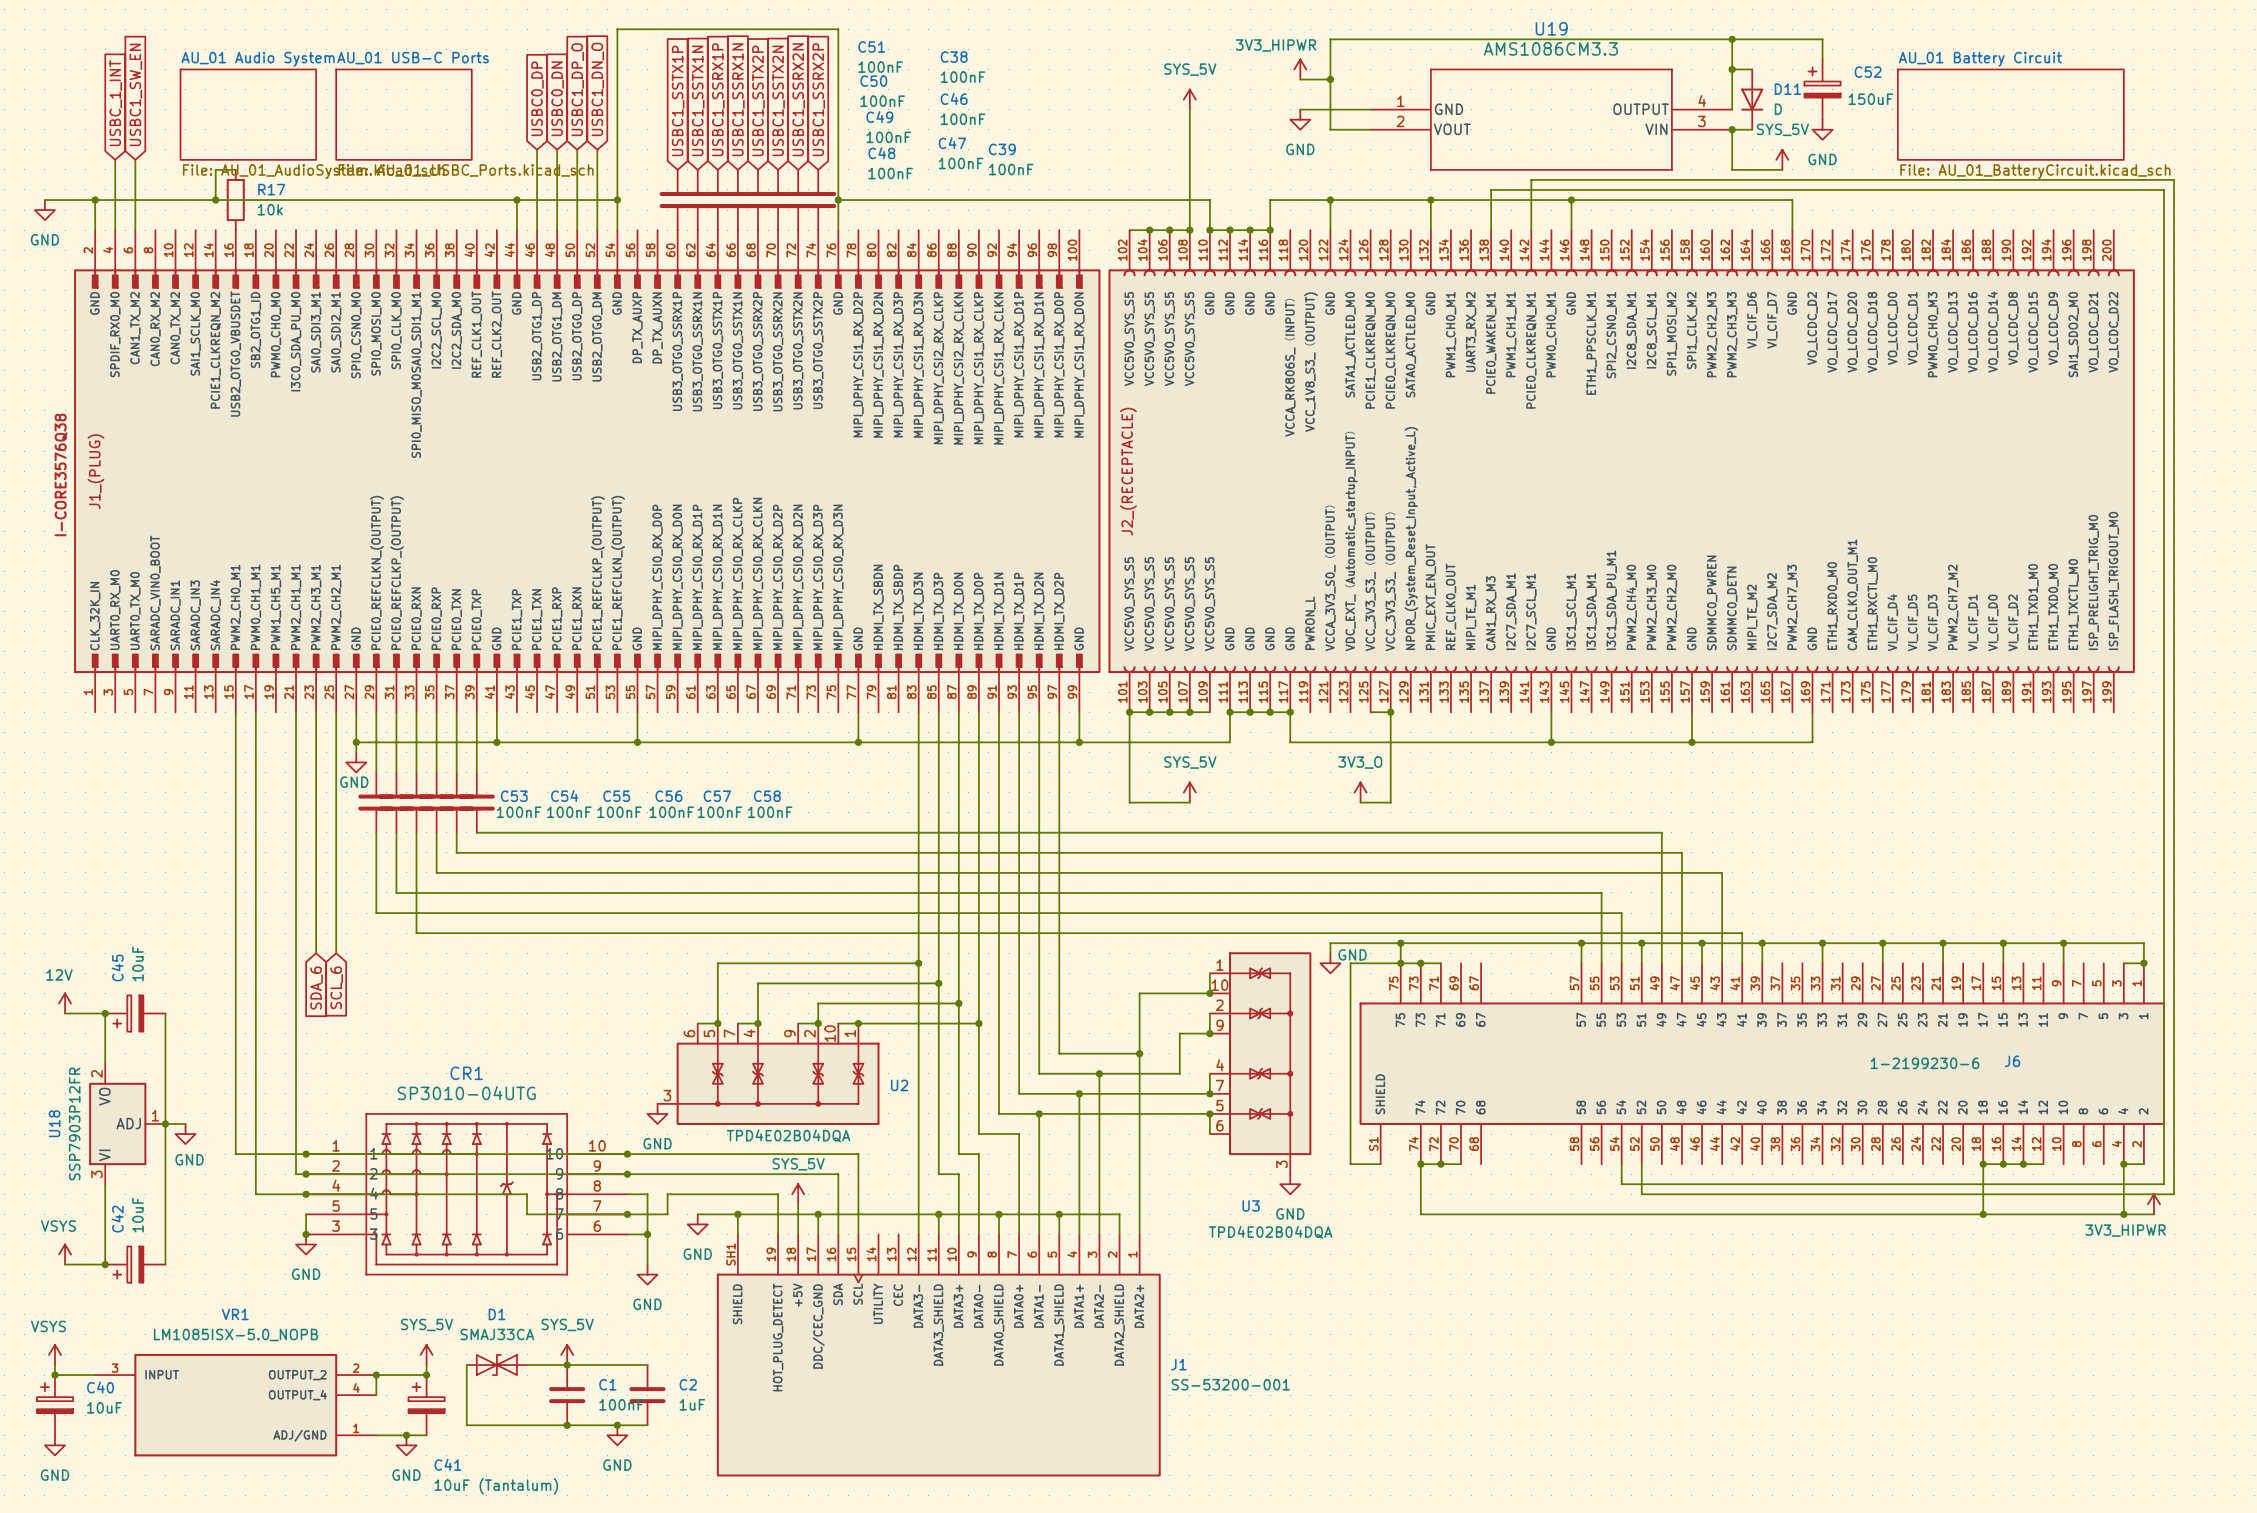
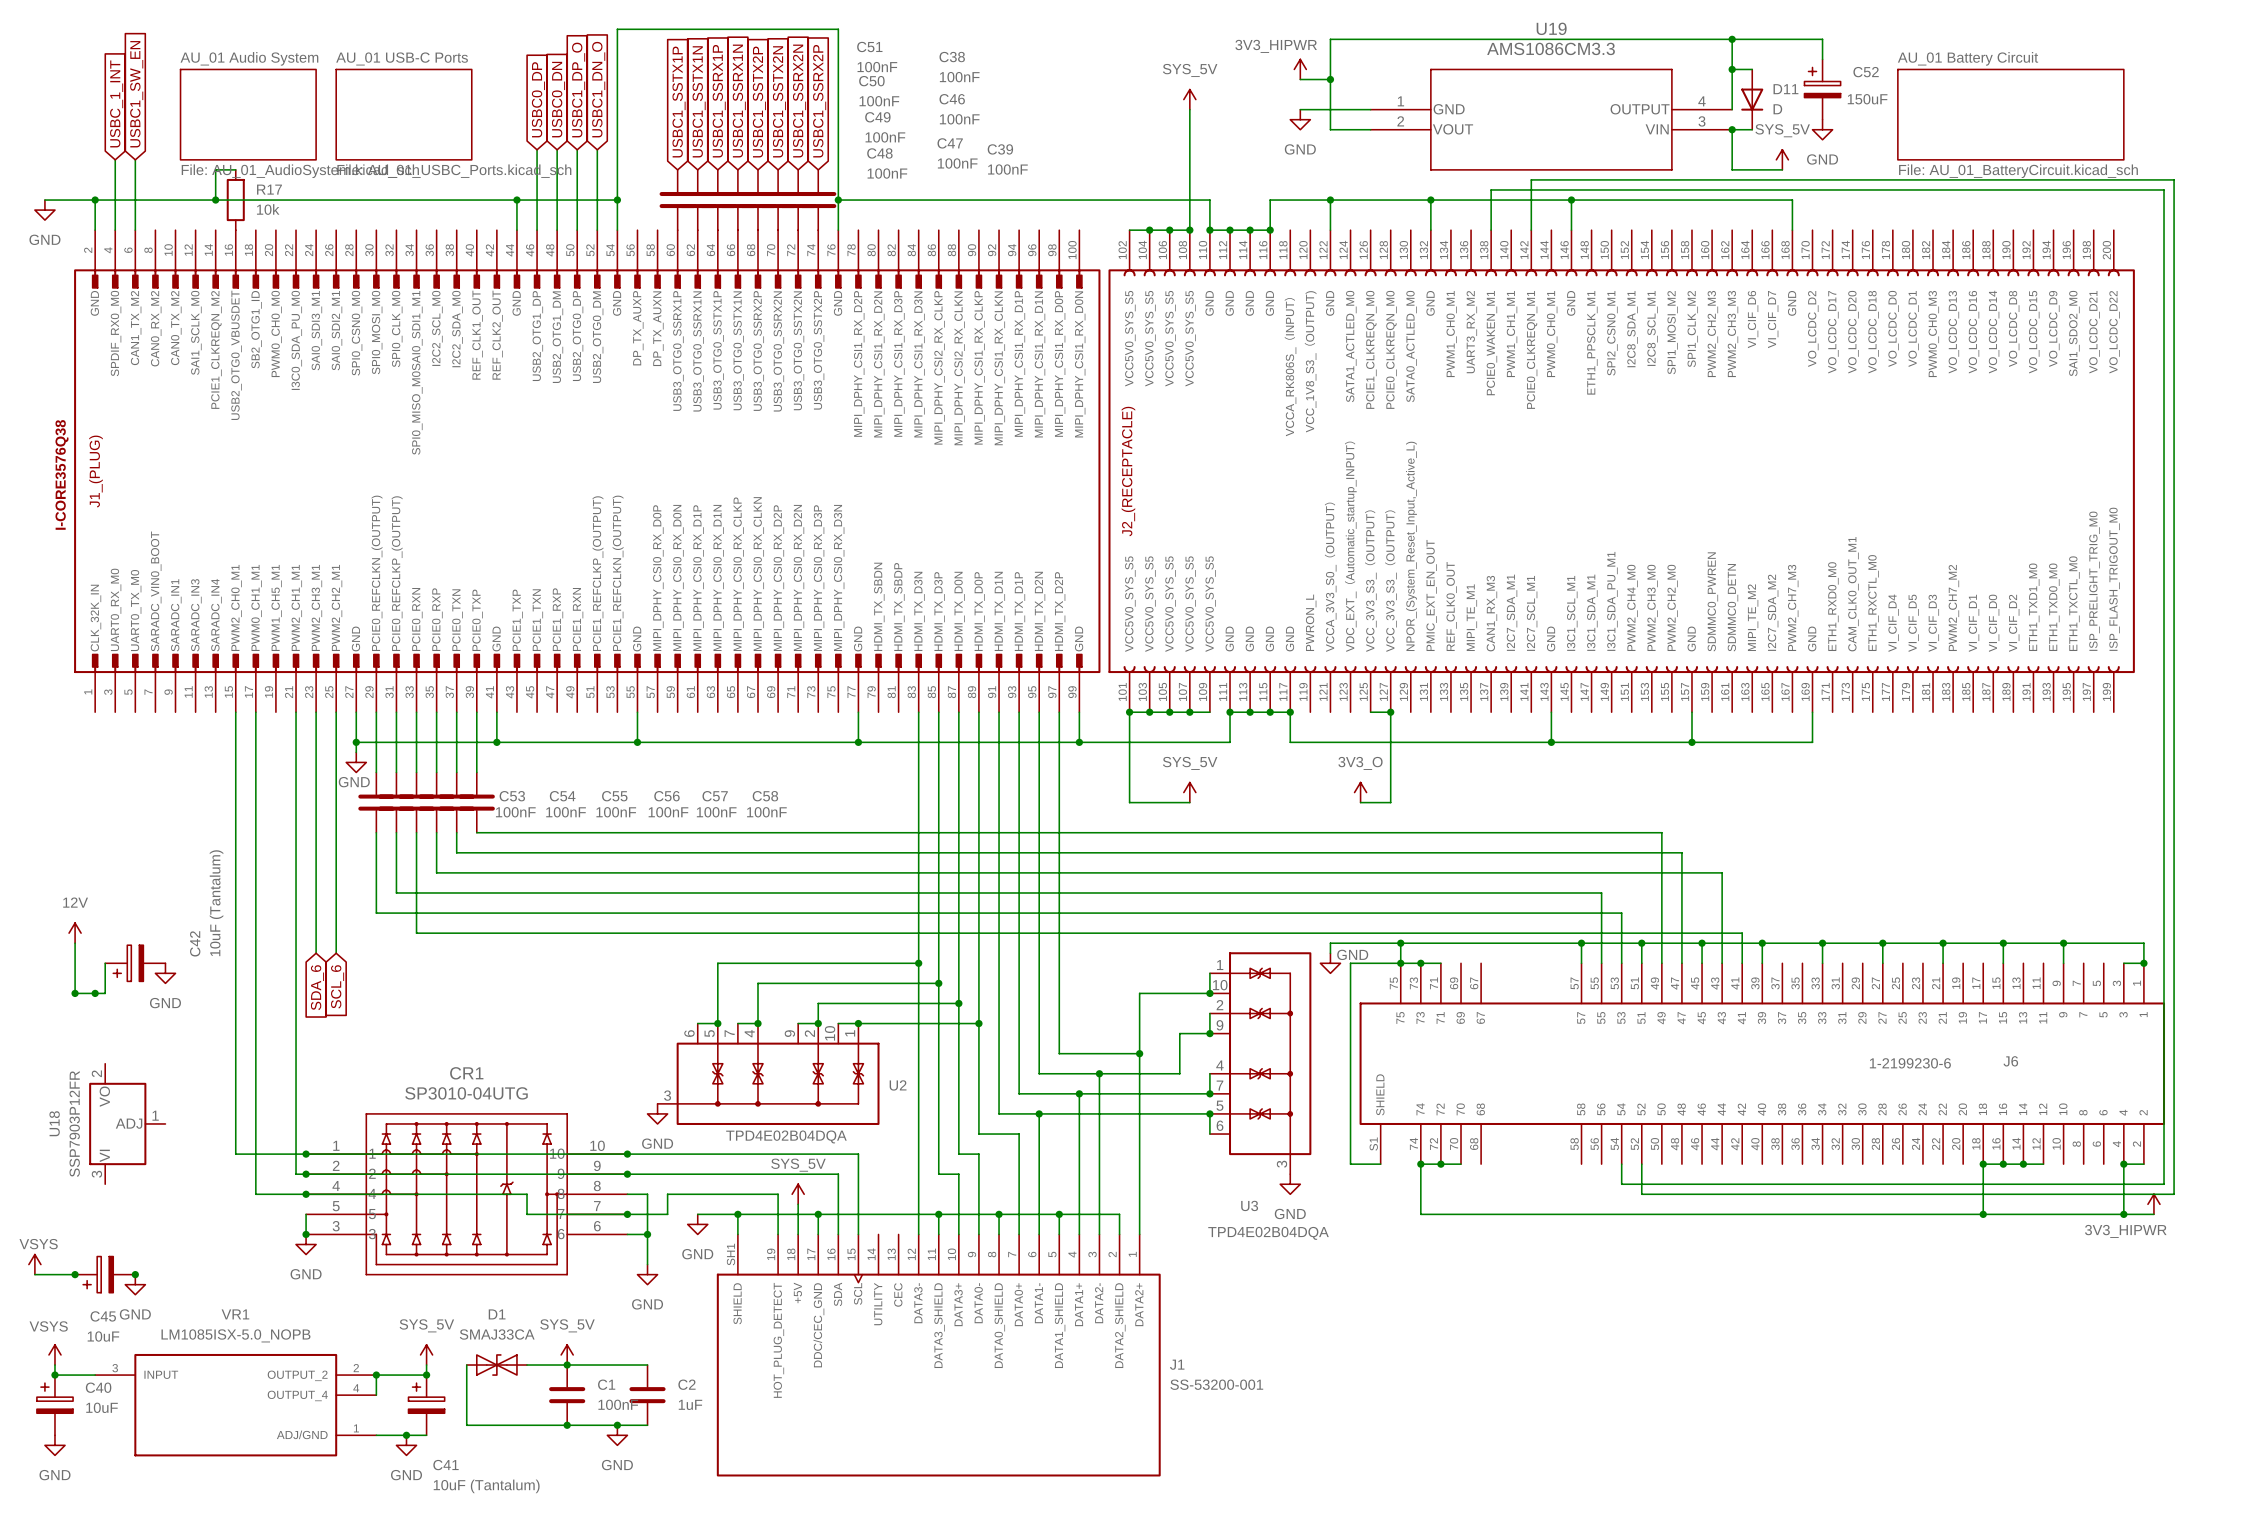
wire: none -> (75, 943) (75, 993) (105, 993) (105, 963)
C45 value rotation: 0° (137, 963) -> 90° clockwise (103, 1336)
C45 value position: 10uF (137, 963) -> 10uF (103, 1336)
C45 name rotation: 0° (117, 968) -> 90° clockwise (103, 1316)
C45 name position: C45 (117, 968) -> C45 (103, 1316)
power symbol: none -> GND (165, 973)
power symbol text position: 12V (59, 974) -> 12V (75, 902)
junction: none -> (75, 993)
junction: none -> (95, 993)
power symbol position: 12V (65, 1003) -> 12V (75, 933)
wire: (65, 1013) (105, 1013) (105, 1063) -> none
junction: (105, 1013) -> none
C45 position: (135, 1013) -> (105, 1274)
wire: (165, 1013) (165, 1264) -> none
wire: (165, 1123) (185, 1123) -> none
junction: (165, 1123) -> none
power symbol: GND (185, 1134) -> none
wire: (105, 1184) (105, 1264) (65, 1264) -> none
C42 value: 10uF (137, 1215) -> 10uF (Tantalum) (216, 903)
C42 name position: C42 (117, 1219) -> C42 (195, 943)
power symbol text position: VSYS (58, 1226) -> VSYS (38, 1244)
power symbol position: VSYS (65, 1254) -> VSYS (34, 1264)
junction: (105, 1264) -> none
C42 position: (135, 1264) -> (135, 963)
wire: none -> (34, 1274) (75, 1274)
junction: none -> (75, 1274)
junction: none -> (135, 1274)
power symbol: none -> GND (135, 1284)

